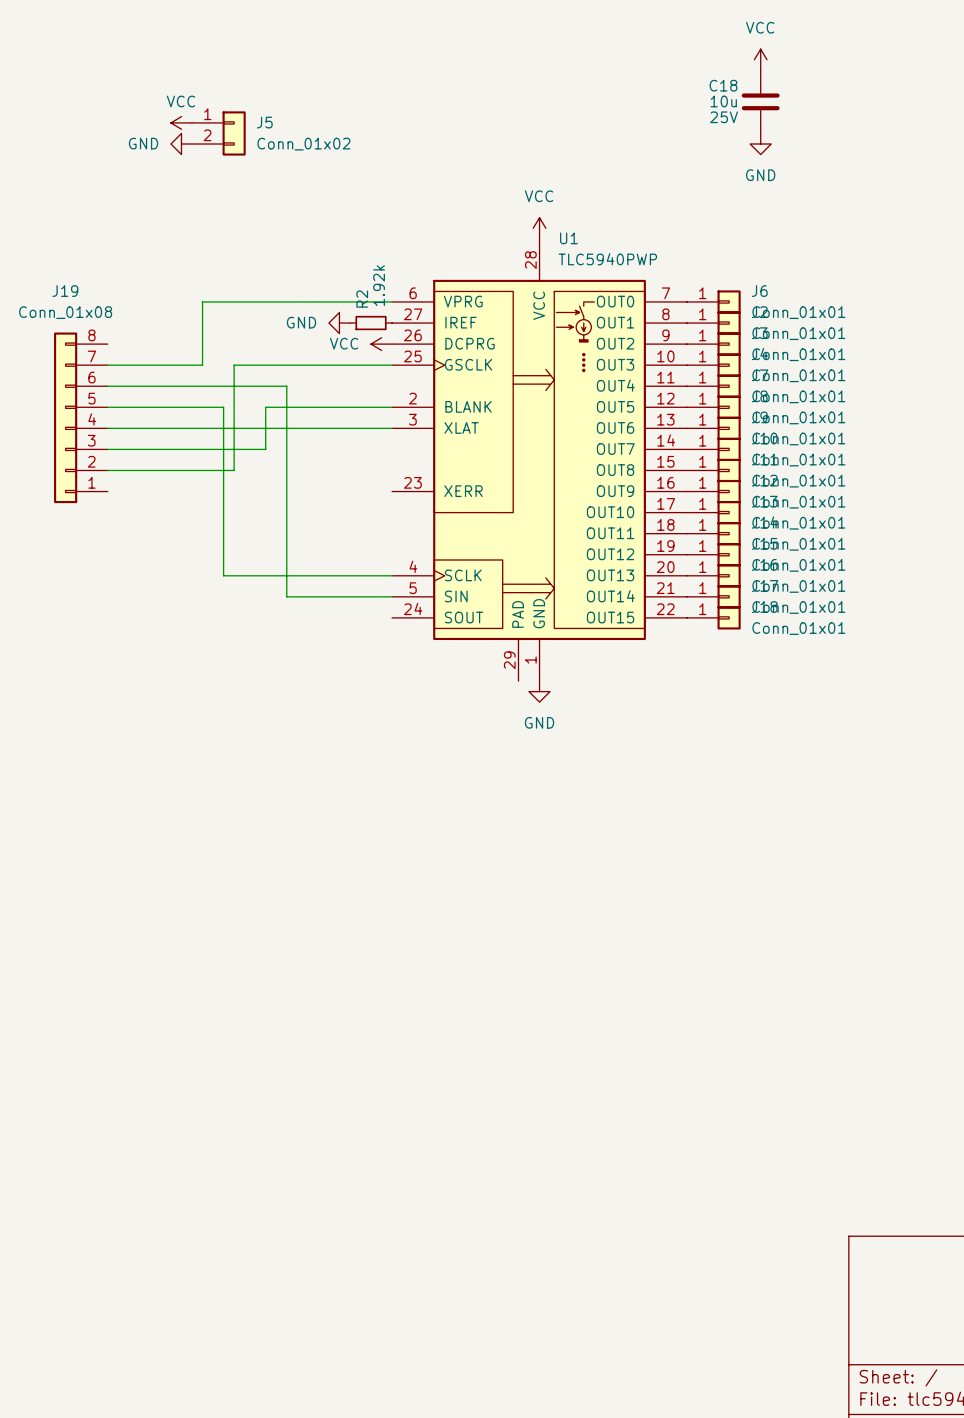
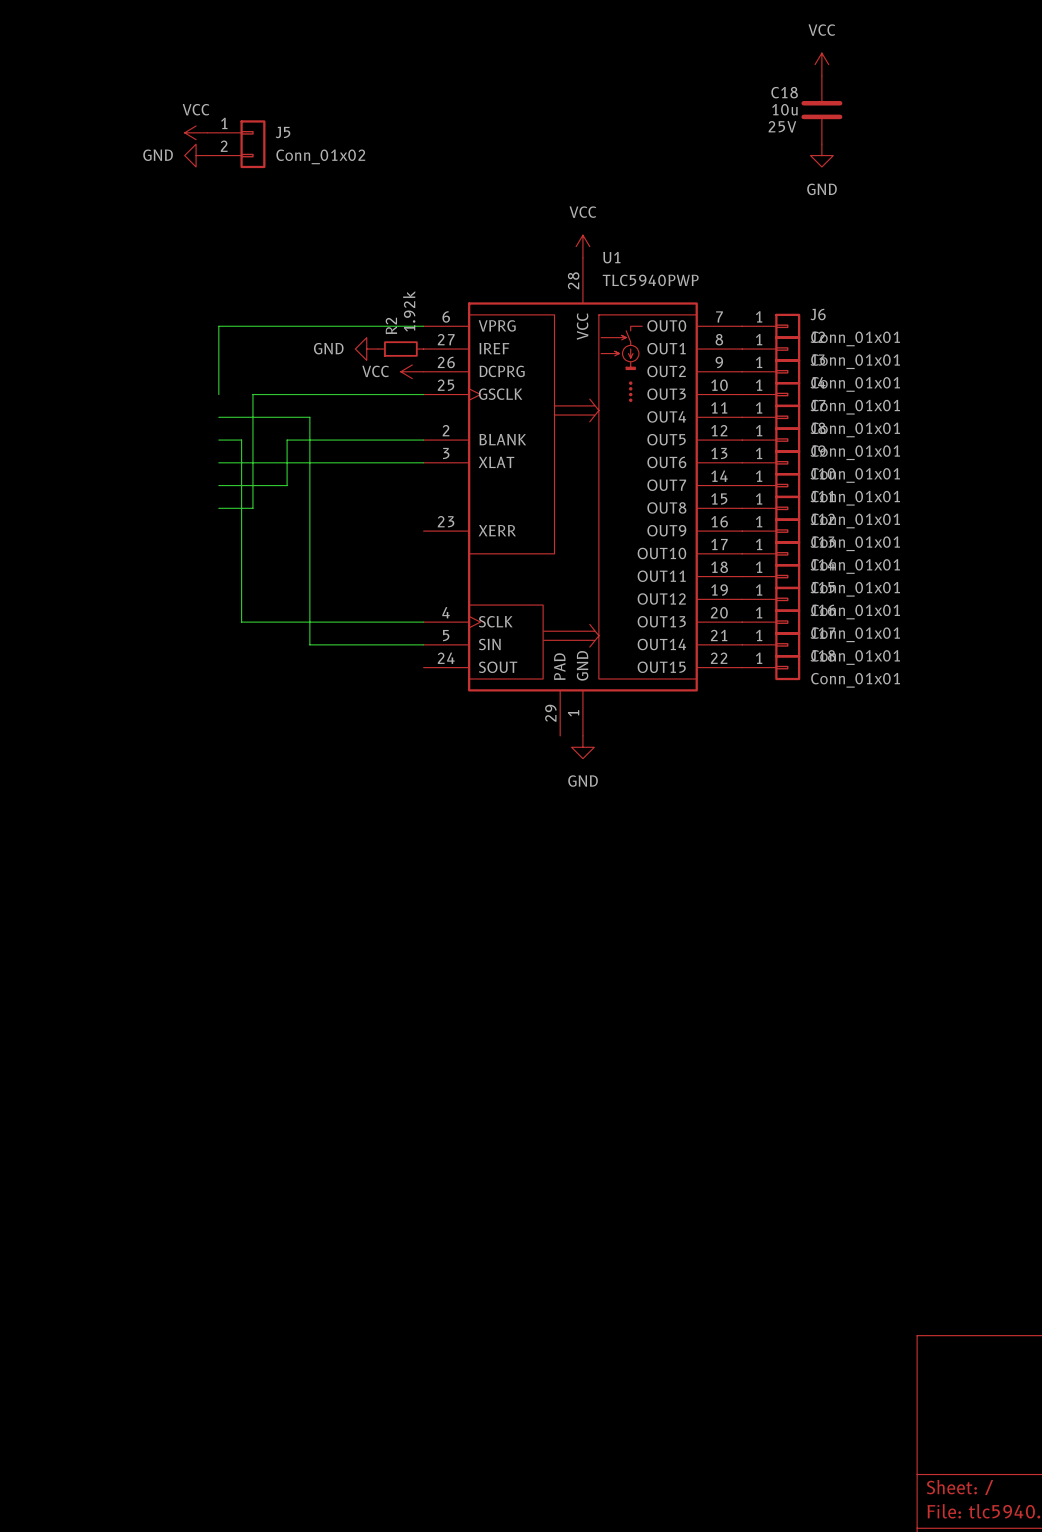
wire: (107, 365) (202, 365) -> none
wire: (107, 386) (202, 386) -> none
wire: (107, 407) (202, 407) -> none
J19: Conn_01x08 (80, 417) -> none
wire: (107, 428) (202, 428) -> none
wire: (107, 449) (202, 449) -> none
wire: (107, 470) (202, 470) -> none

